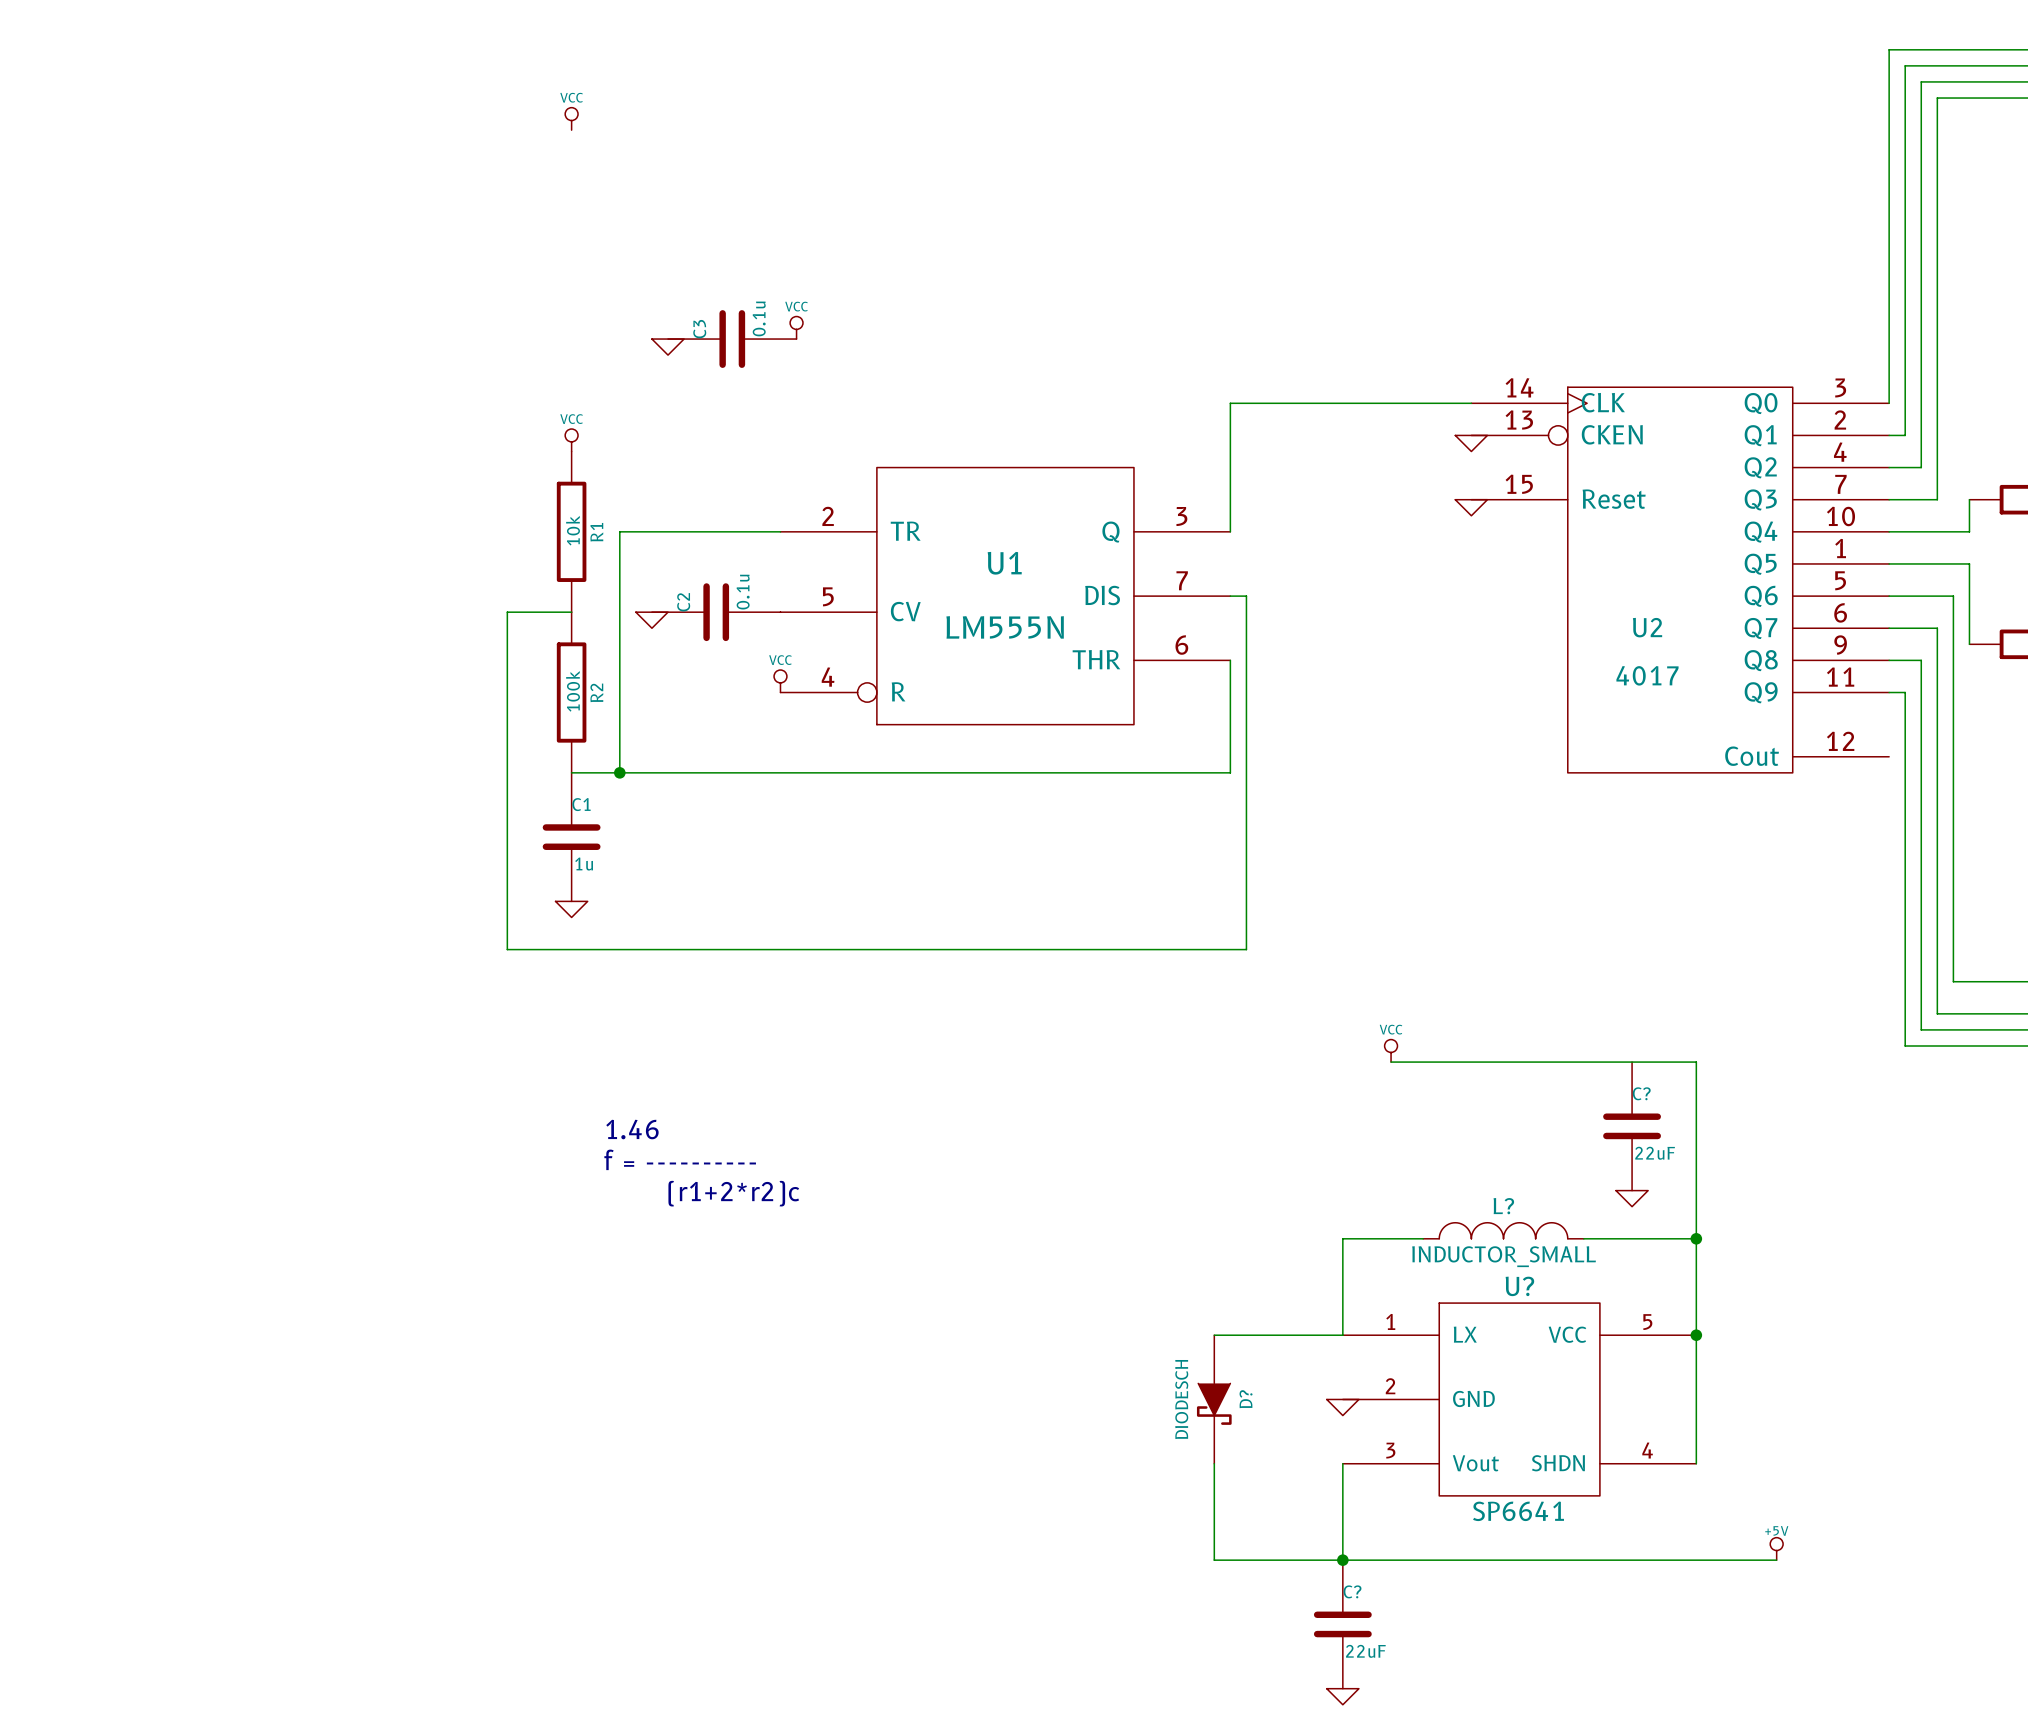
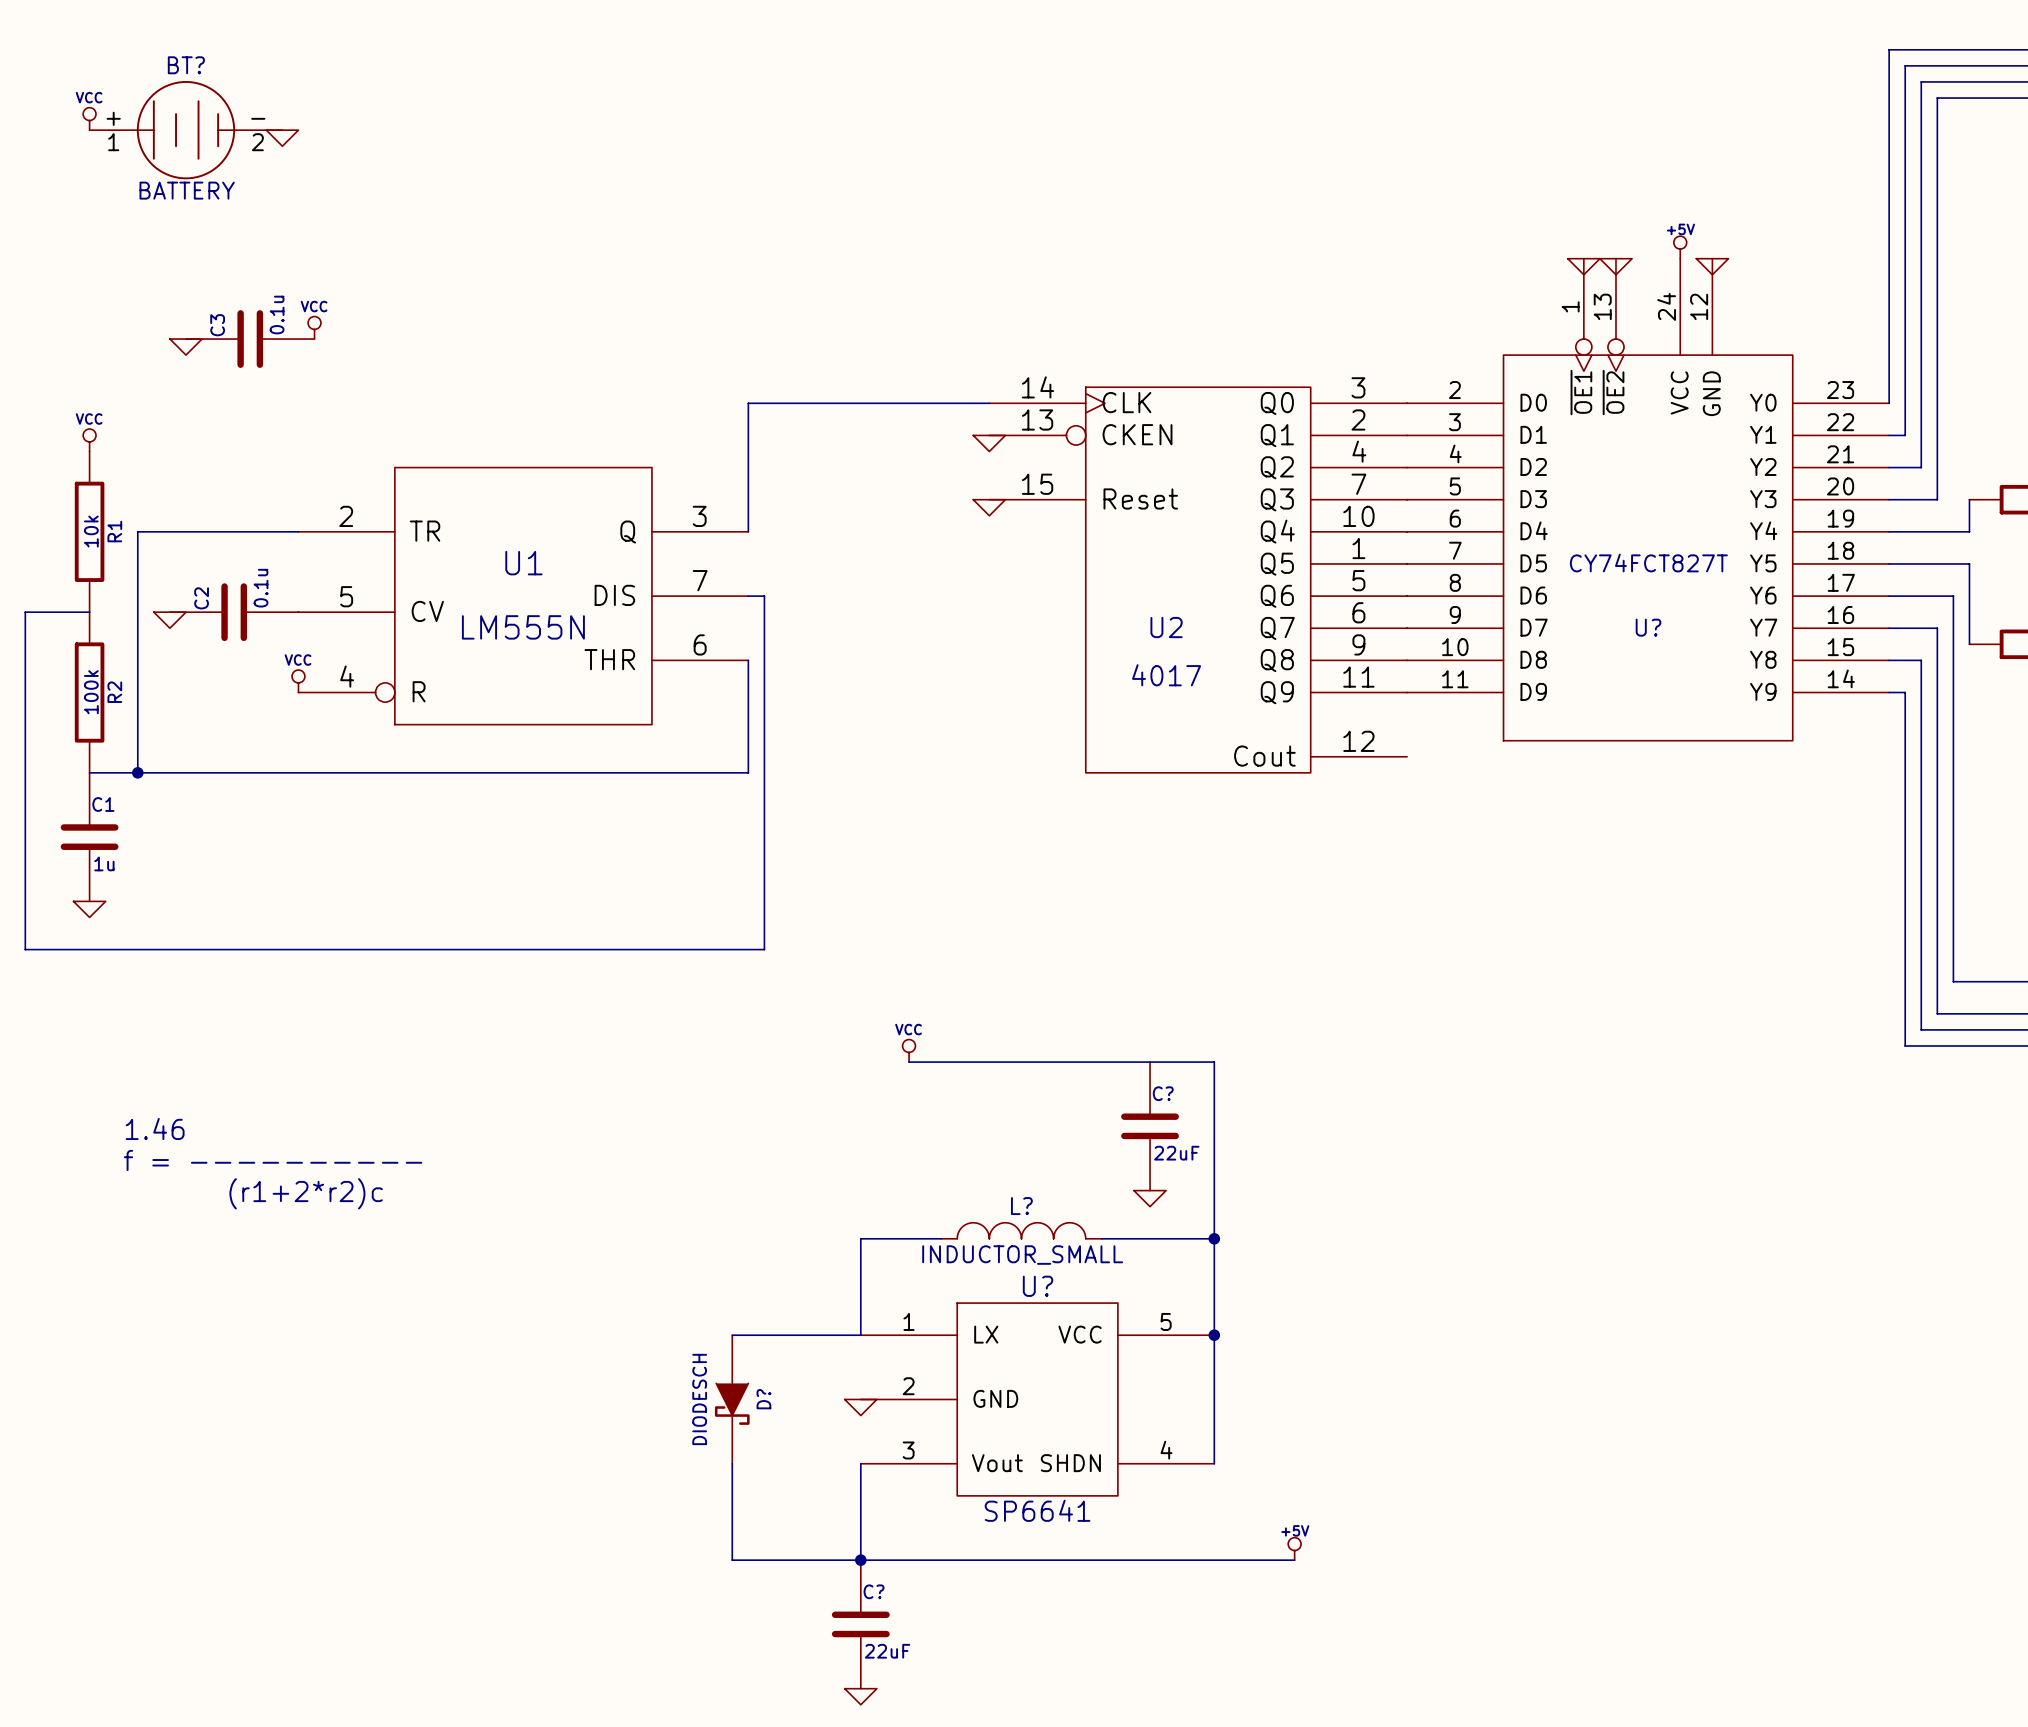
power symbol: none -> VCC (89, 118)
power symbol: VCC (571, 118) -> none
BT?: none -> BATTERY (185, 130)
power symbol: none -> (282, 138)
power symbol: none -> +5V (1680, 247)
power symbol: none -> (1583, 266)
power symbol: none -> (1615, 266)
power symbol: none -> (1712, 266)
power symbol: none -> VCC (314, 327)
power symbol: VCC (796, 327) -> none
C3 position: (732, 339) -> (250, 339)
power symbol: none -> (185, 347)
power symbol: (668, 347) -> none
wire: none -> (989, 403) (748, 403) (748, 531)
wire: (1471, 403) (1230, 403) (1230, 531) -> none
power symbol: none -> VCC (89, 440)
power symbol: VCC (571, 440) -> none
power symbol: none -> (989, 443)
power symbol: (1471, 443) -> none
U?: none -> CY74FCT827T (1648, 499)
power symbol: none -> (989, 507)
power symbol: (1471, 507) -> none
wire: none -> (298, 531) (137, 531) (137, 772)
R1 position: (571, 531) -> (89, 531)
wire: (780, 531) (619, 531) (619, 772) -> none
U2 position: (1680, 580) -> (1198, 580)
U1 position: (1005, 596) -> (523, 596)
wire: (1230, 596) (1246, 596) (1246, 949) (764, 949) -> (748, 596) (764, 596) (764, 949)
wire: (571, 612) (507, 612) (507, 949) -> (89, 612) (25, 612) (25, 949) (507, 949)
C2 position: (716, 612) -> (234, 612)
power symbol: none -> (169, 620)
power symbol: (651, 620) -> none
wire: (1230, 660) (1230, 772) (748, 772) -> (748, 660) (748, 772)
power symbol: none -> VCC (298, 681)
power symbol: VCC (780, 681) -> none
R2 position: (571, 692) -> (89, 692)
wire: none -> (89, 772) (571, 772)
junction: none -> (137, 772)
junction: (619, 772) -> none
C1 position: (571, 837) -> (89, 837)
power symbol: none -> (89, 909)
power symbol: (571, 909) -> none
power symbol: none -> VCC (909, 1050)
power symbol: VCC (1391, 1050) -> none
wire: none -> (909, 1062) (1214, 1062) (1214, 1463)
wire: (1391, 1062) (1696, 1062) (1696, 1463) -> none
C?: none -> 22uF (1150, 1126)
C?: 22uF (1632, 1126) -> none
text: none -> 1.46 (155, 1128)
text: 1.46 (632, 1129) -> none
text: none -> f = ---------- (273, 1160)
text: f = ---------- (680, 1159) -> none
text: none -> (r1+2*r2)c (306, 1193)
text: (r1+2*r2)c (733, 1193) -> none
power symbol: none -> (1150, 1198)
power symbol: (1632, 1198) -> none
L?: none -> INDUCTOR_SMALL (1021, 1230)
L?: INDUCTOR_SMALL (1503, 1230) -> none
wire: none -> (941, 1238) (860, 1238) (860, 1335) (732, 1335)
wire: none -> (1101, 1238) (1214, 1238)
junction: none -> (1214, 1238)
wire: (1423, 1238) (1342, 1238) (1342, 1335) (1214, 1335) -> none
wire: (1583, 1238) (1696, 1238) -> none
junction: (1696, 1238) -> none
junction: none -> (1214, 1335)
junction: (1696, 1335) -> none
D?: none -> DIODESCH (732, 1399)
U?: none -> SP6641 (1037, 1399)
D?: DIODESCH (1214, 1399) -> none
U?: SP6641 (1519, 1399) -> none
power symbol: none -> (860, 1407)
power symbol: (1342, 1407) -> none
wire: none -> (860, 1463) (860, 1560)
wire: (1214, 1463) (1214, 1560) -> (732, 1463) (732, 1560) (1214, 1560)
wire: (1342, 1463) (1342, 1560) -> none
power symbol: none -> +5V (1294, 1548)
power symbol: +5V (1776, 1548) -> none
junction: none -> (860, 1560)
wire: (1294, 1560) (1776, 1560) -> none
junction: (1342, 1560) -> none
C?: none -> 22uF (860, 1624)
C?: 22uF (1342, 1624) -> none
power symbol: none -> (860, 1696)
power symbol: (1342, 1696) -> none

